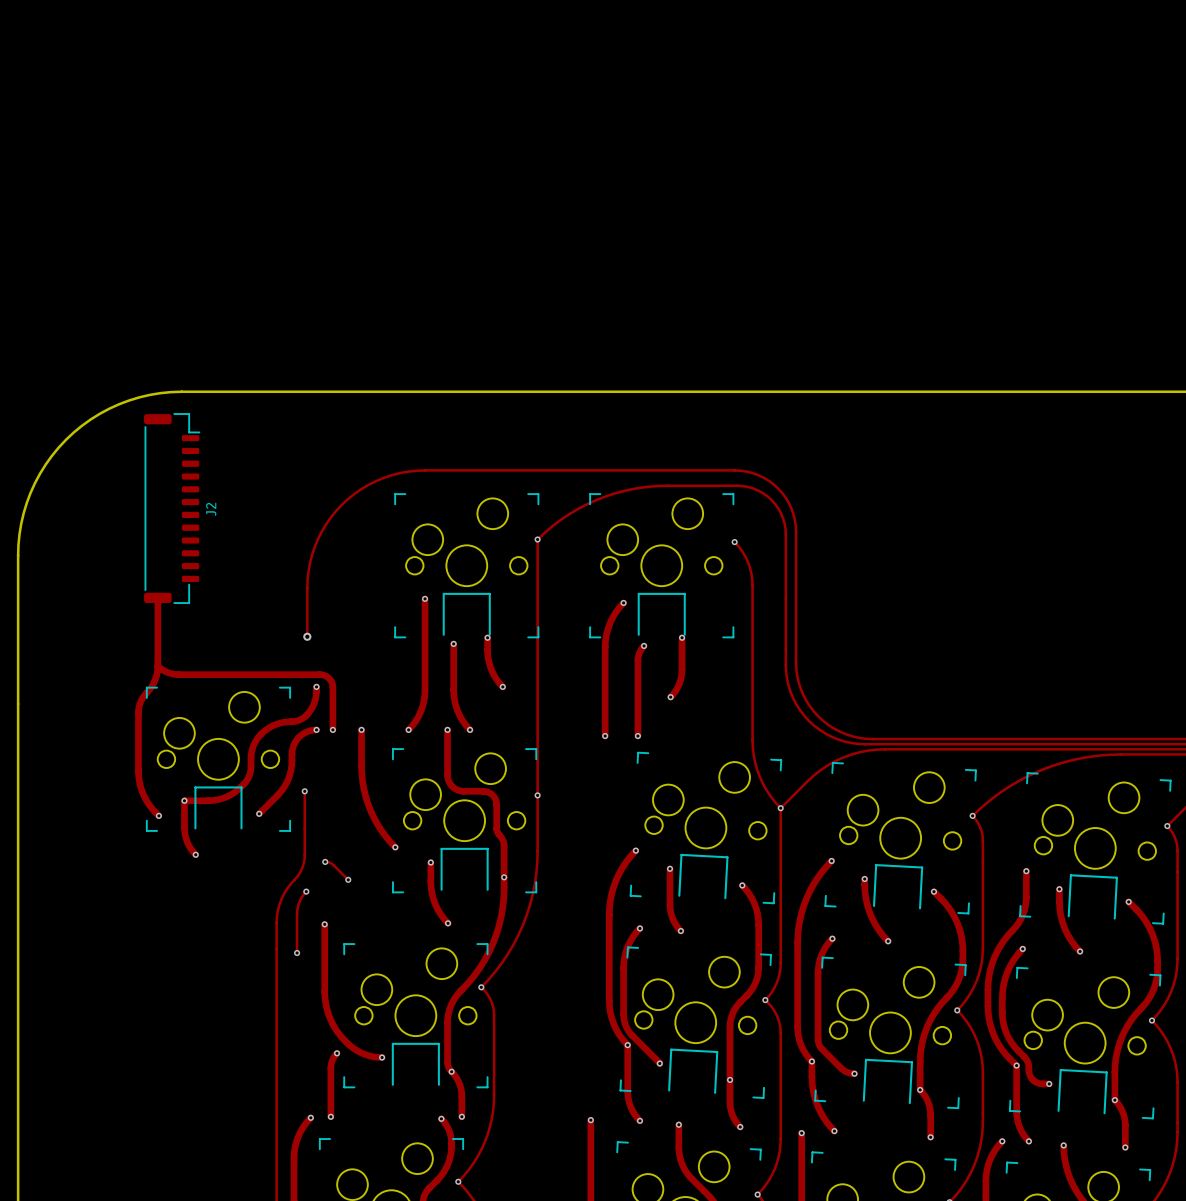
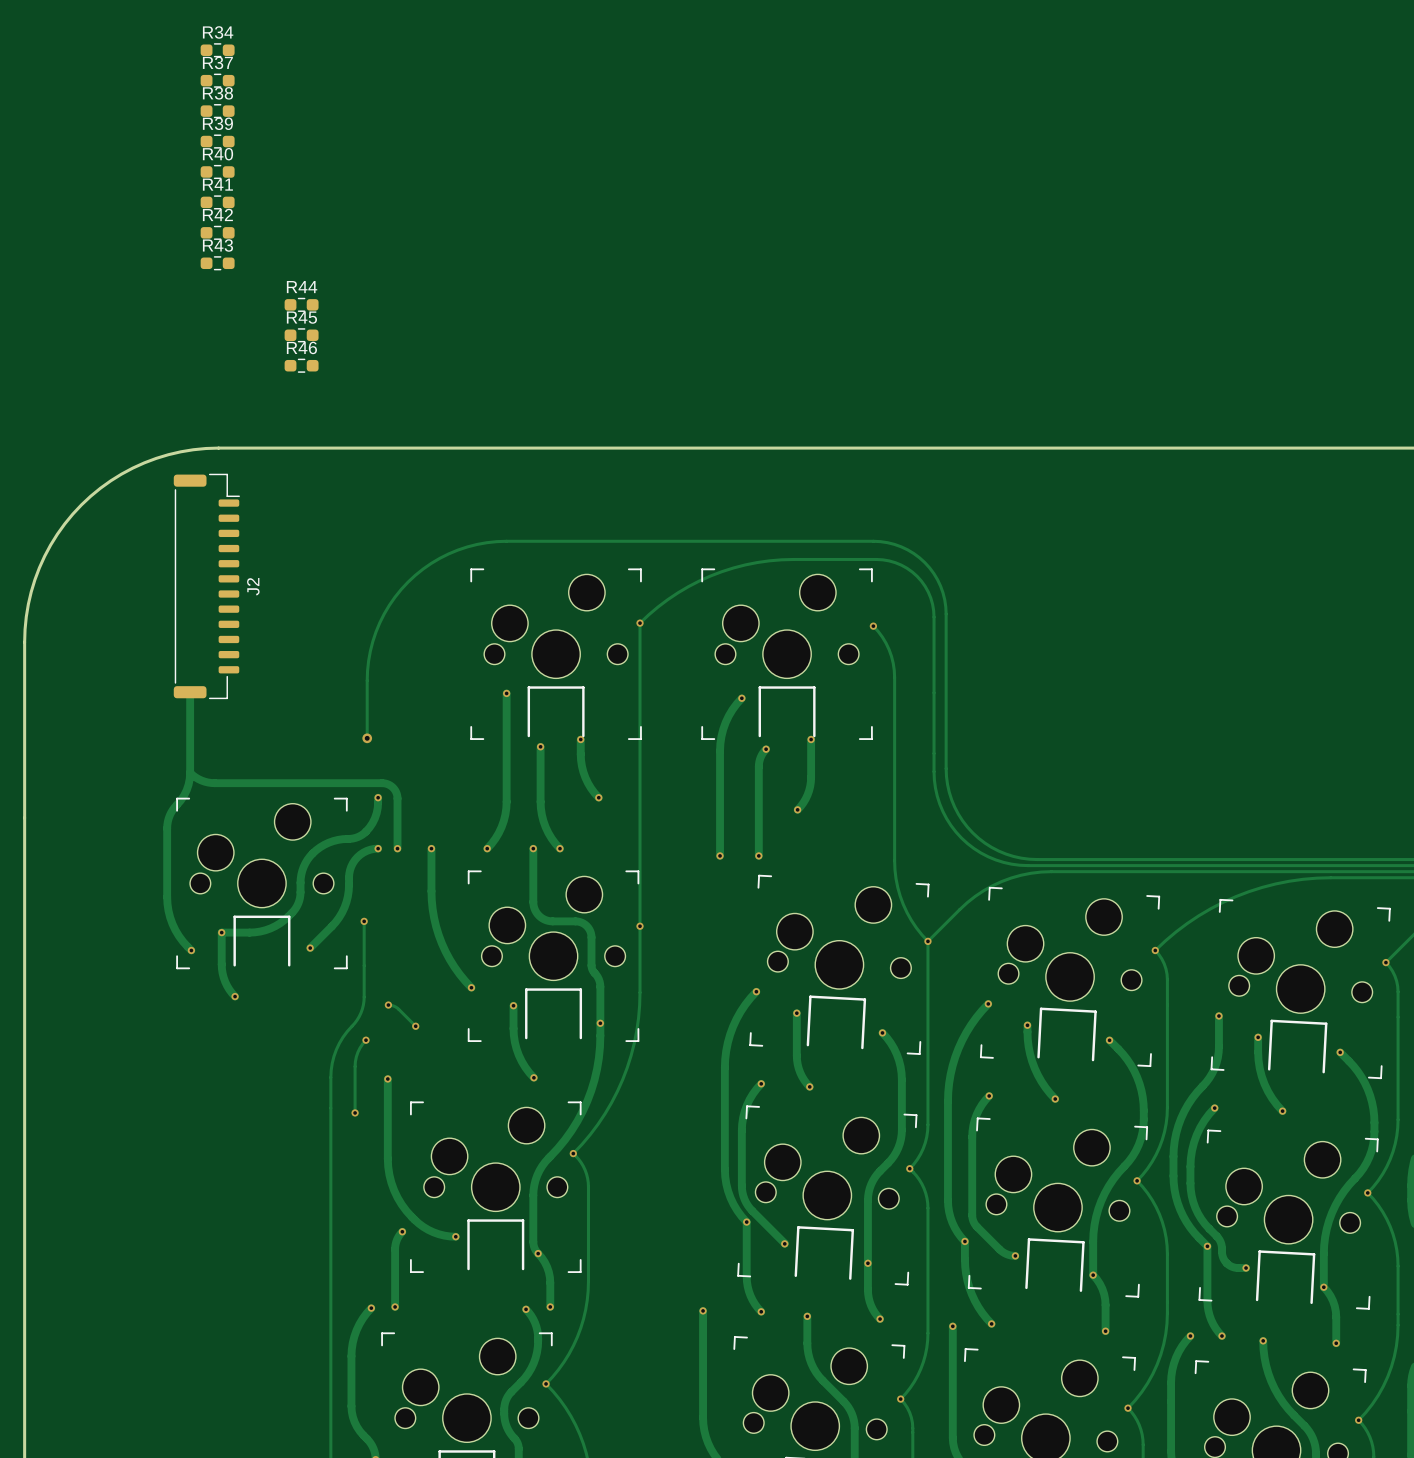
R34: none -> (217, 50)
R37: none -> (217, 80)
R38: none -> (217, 111)
R39: none -> (217, 141)
R40: none -> (217, 171)
R41: none -> (217, 202)
R42: none -> (217, 232)
R43: none -> (217, 263)
R44: none -> (301, 304)
R45: none -> (301, 335)
R46: none -> (301, 365)

